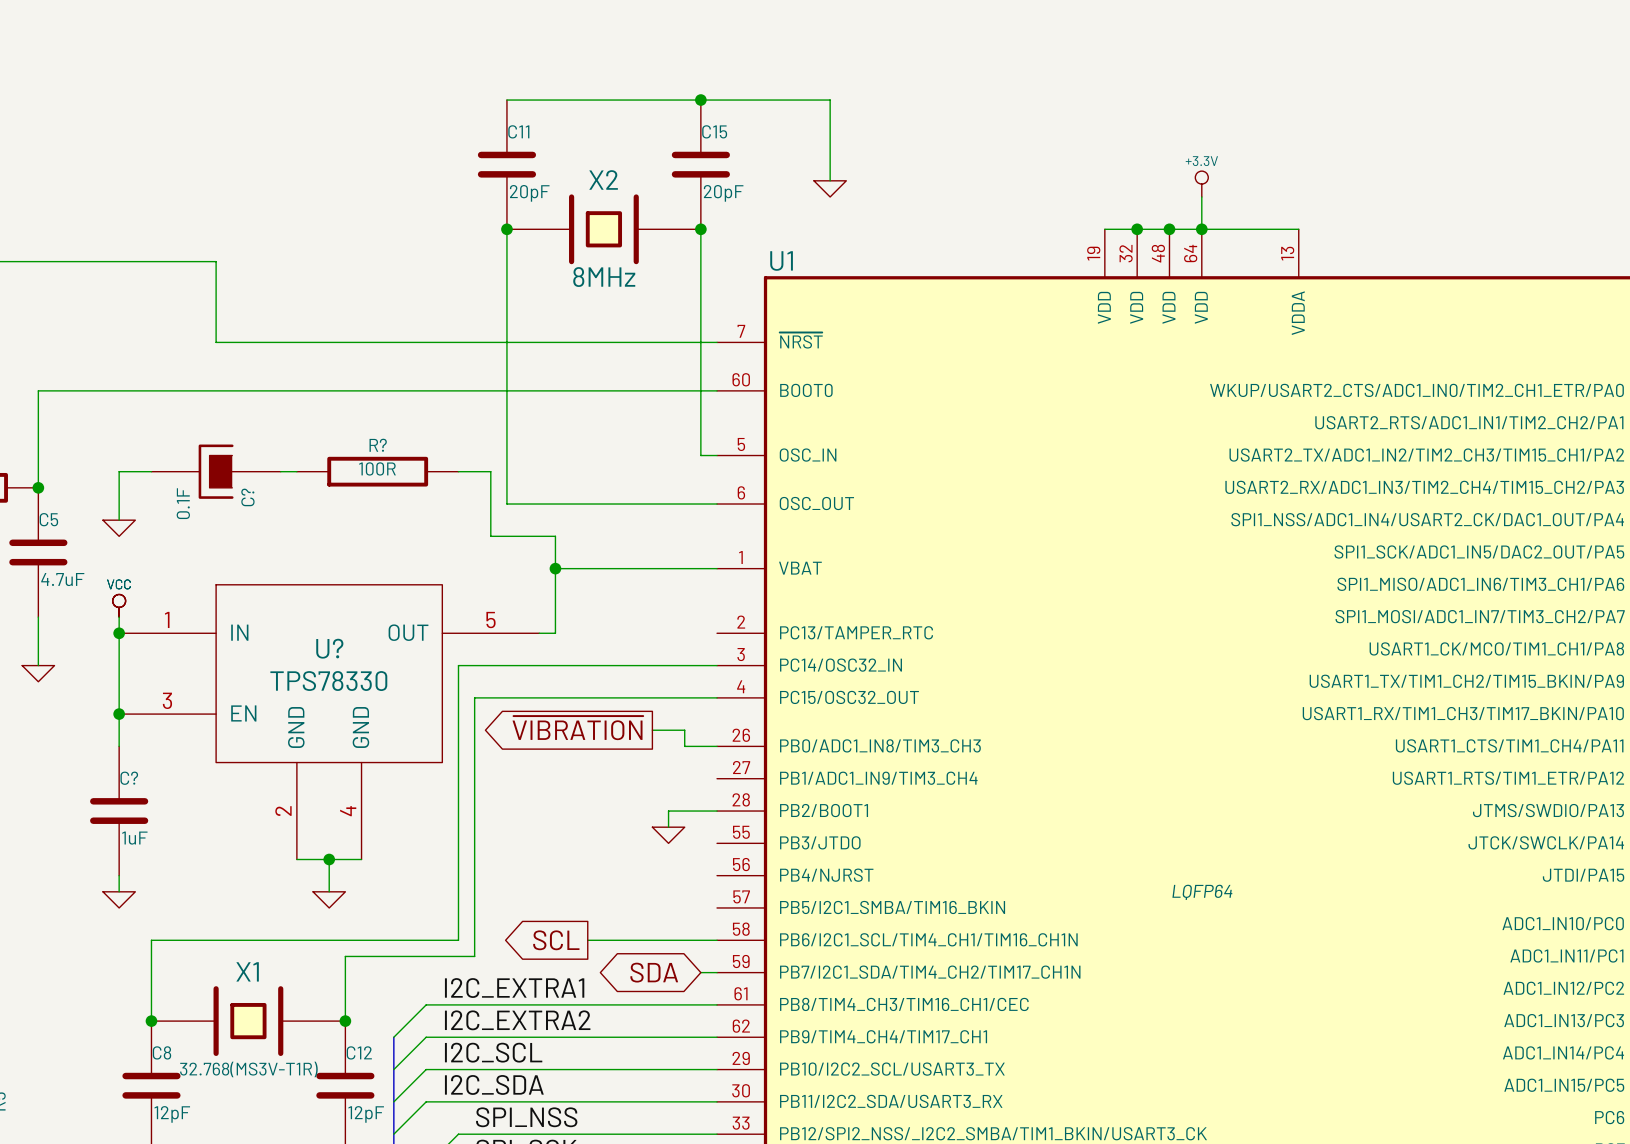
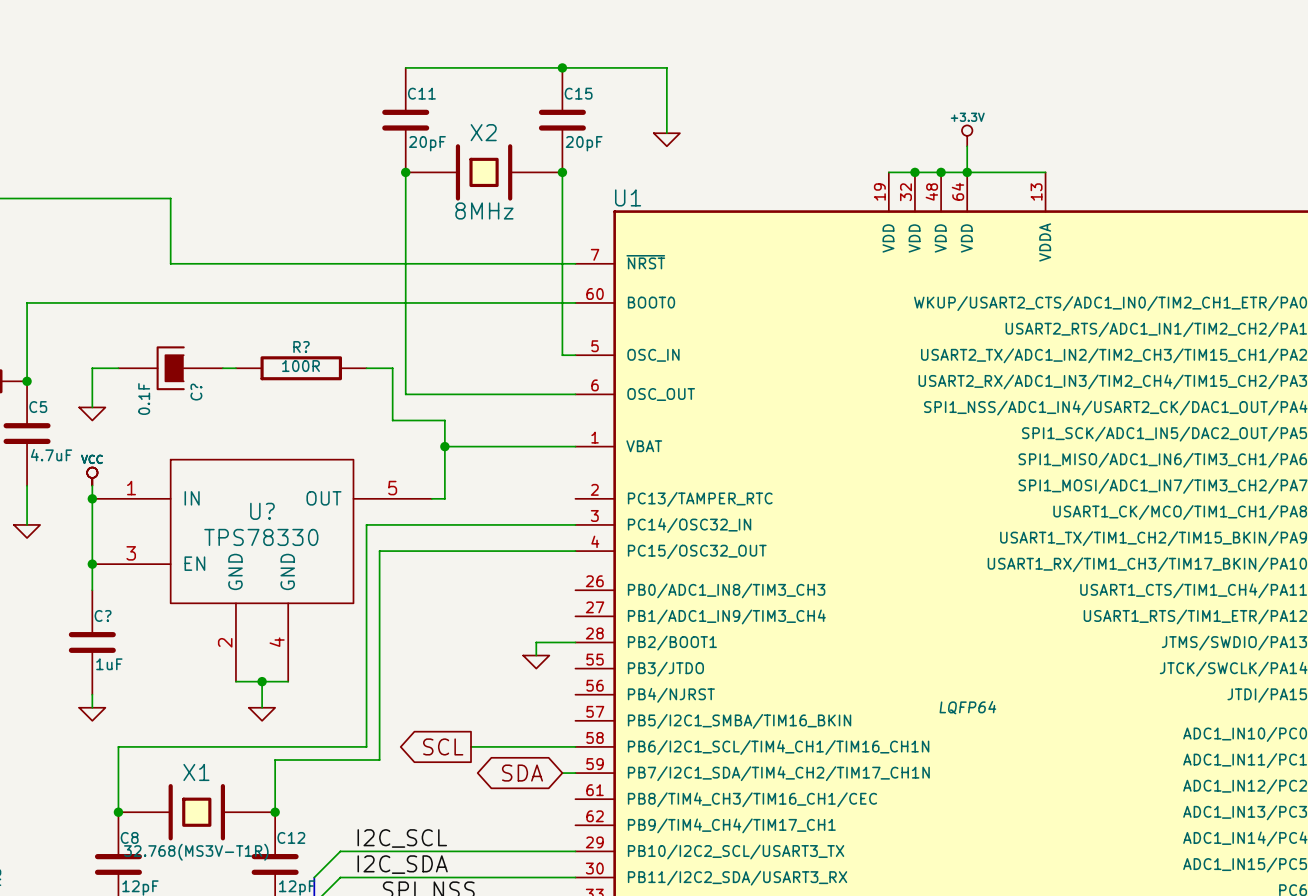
global label: ~{VIBRATION} (577, 728) -> none
wire: (652, 730) (684, 730) (684, 746) (717, 746) -> none
label: I2C_EXTRA1 (514, 988) -> none
wire: (717, 1004) (426, 1004) (393, 1037) -> none
label: I2C_EXTRA2 (517, 1020) -> none
bus: (393, 1037) (393, 1101) -> none
wire: (717, 1037) (426, 1037) (393, 1069) -> none

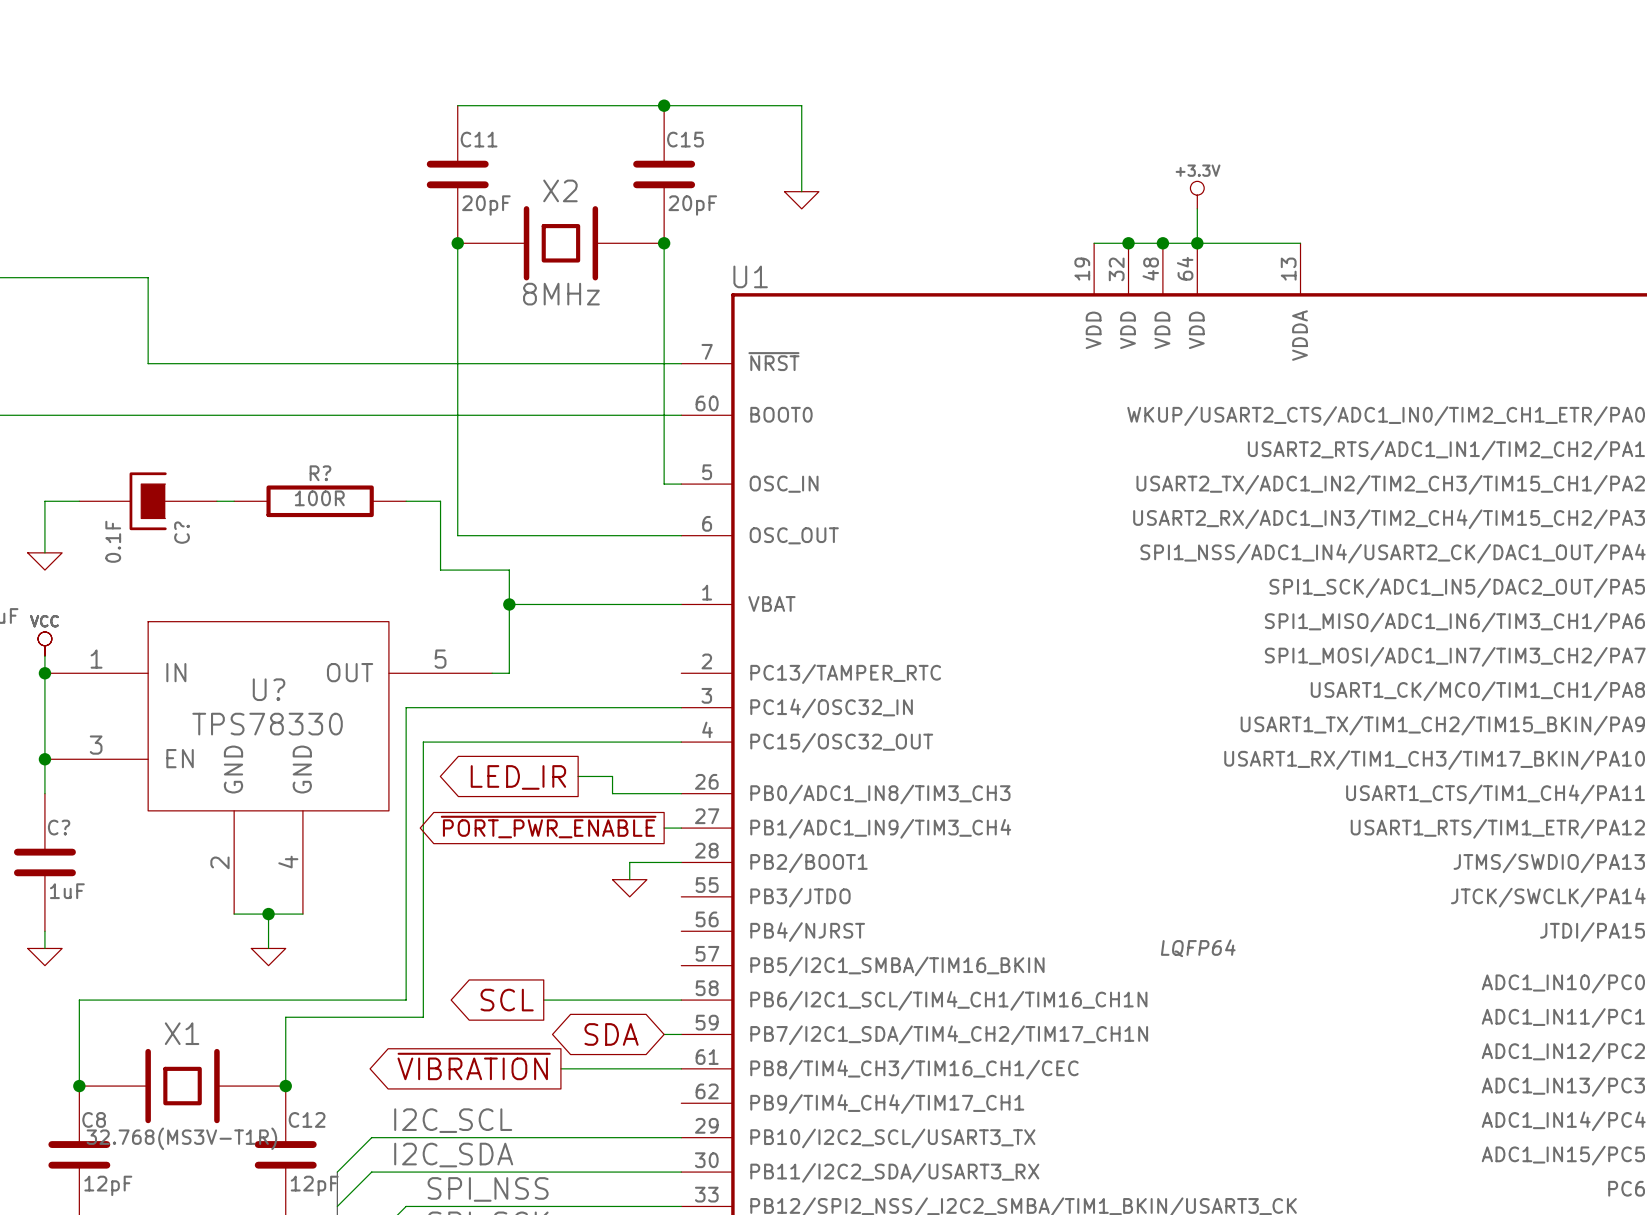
global label: none -> LED_IR (518, 777)
wire: none -> (578, 776) (612, 776) (612, 793) (681, 793)
global label: none -> ~{PORT_PWR_ENABLE} (548, 827)
wire: none -> (664, 828) (681, 828)
global label: none -> ~{VIBRATION} (474, 1066)
wire: none -> (560, 1068) (681, 1068)

